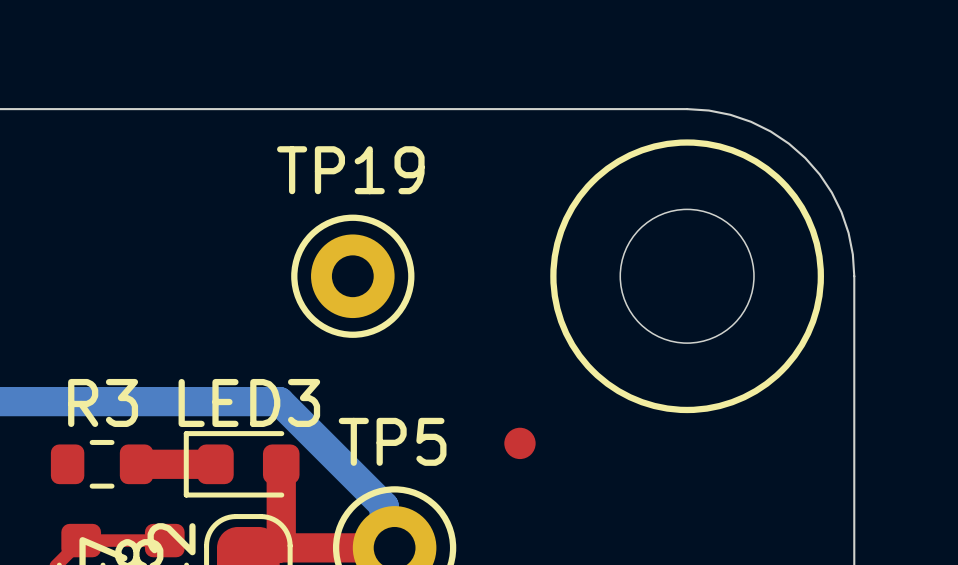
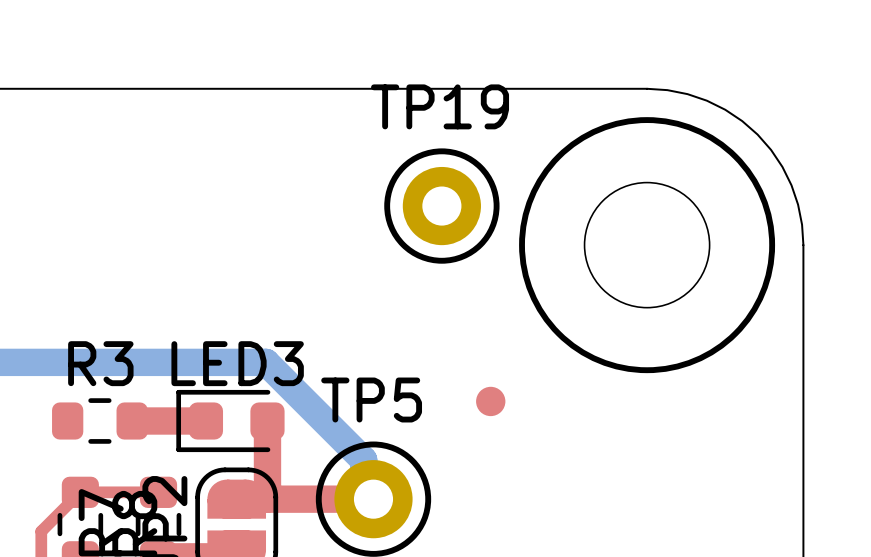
TP19 position: (352, 276) -> (441, 206)

